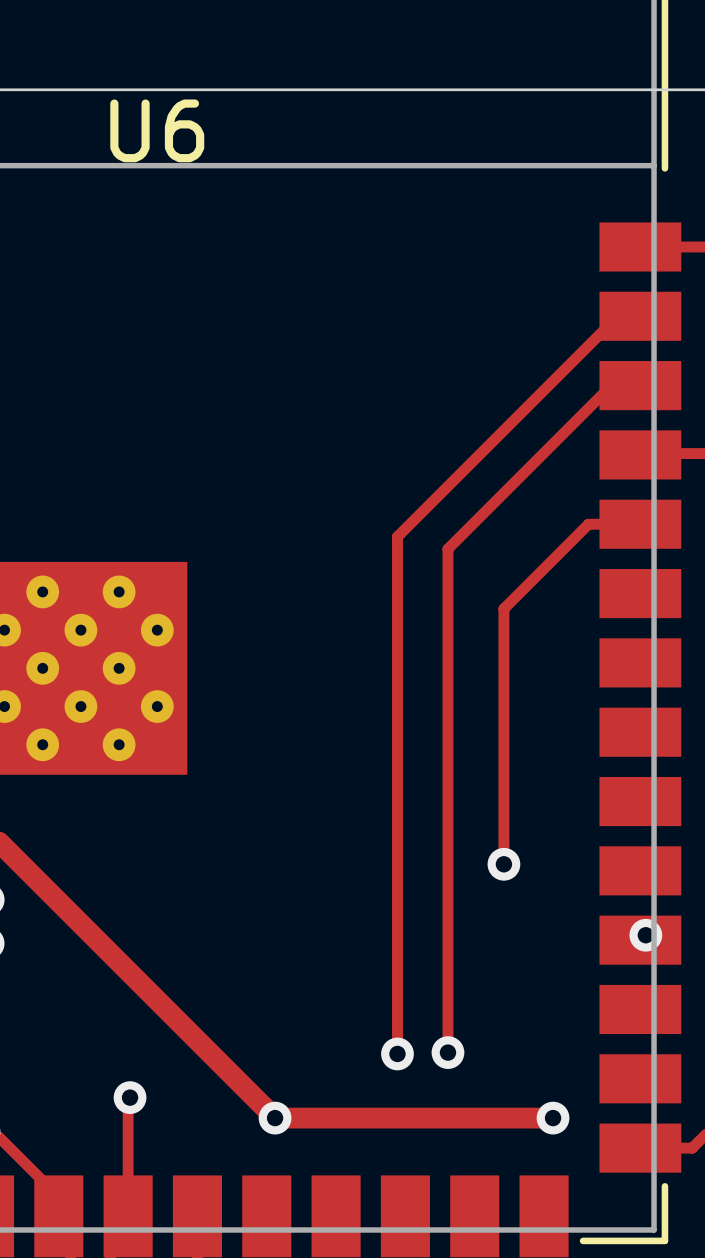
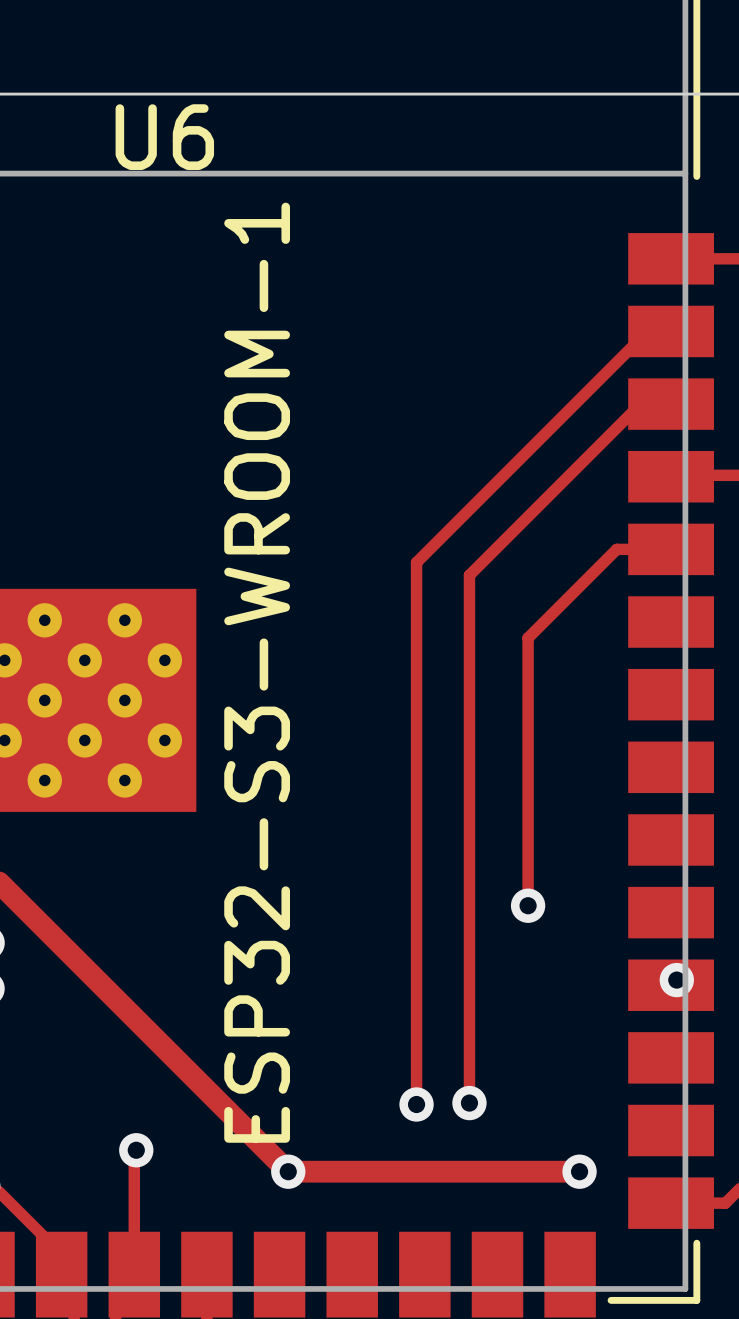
text: none -> ESP32-S3-WROOM-1 (257, 672)

